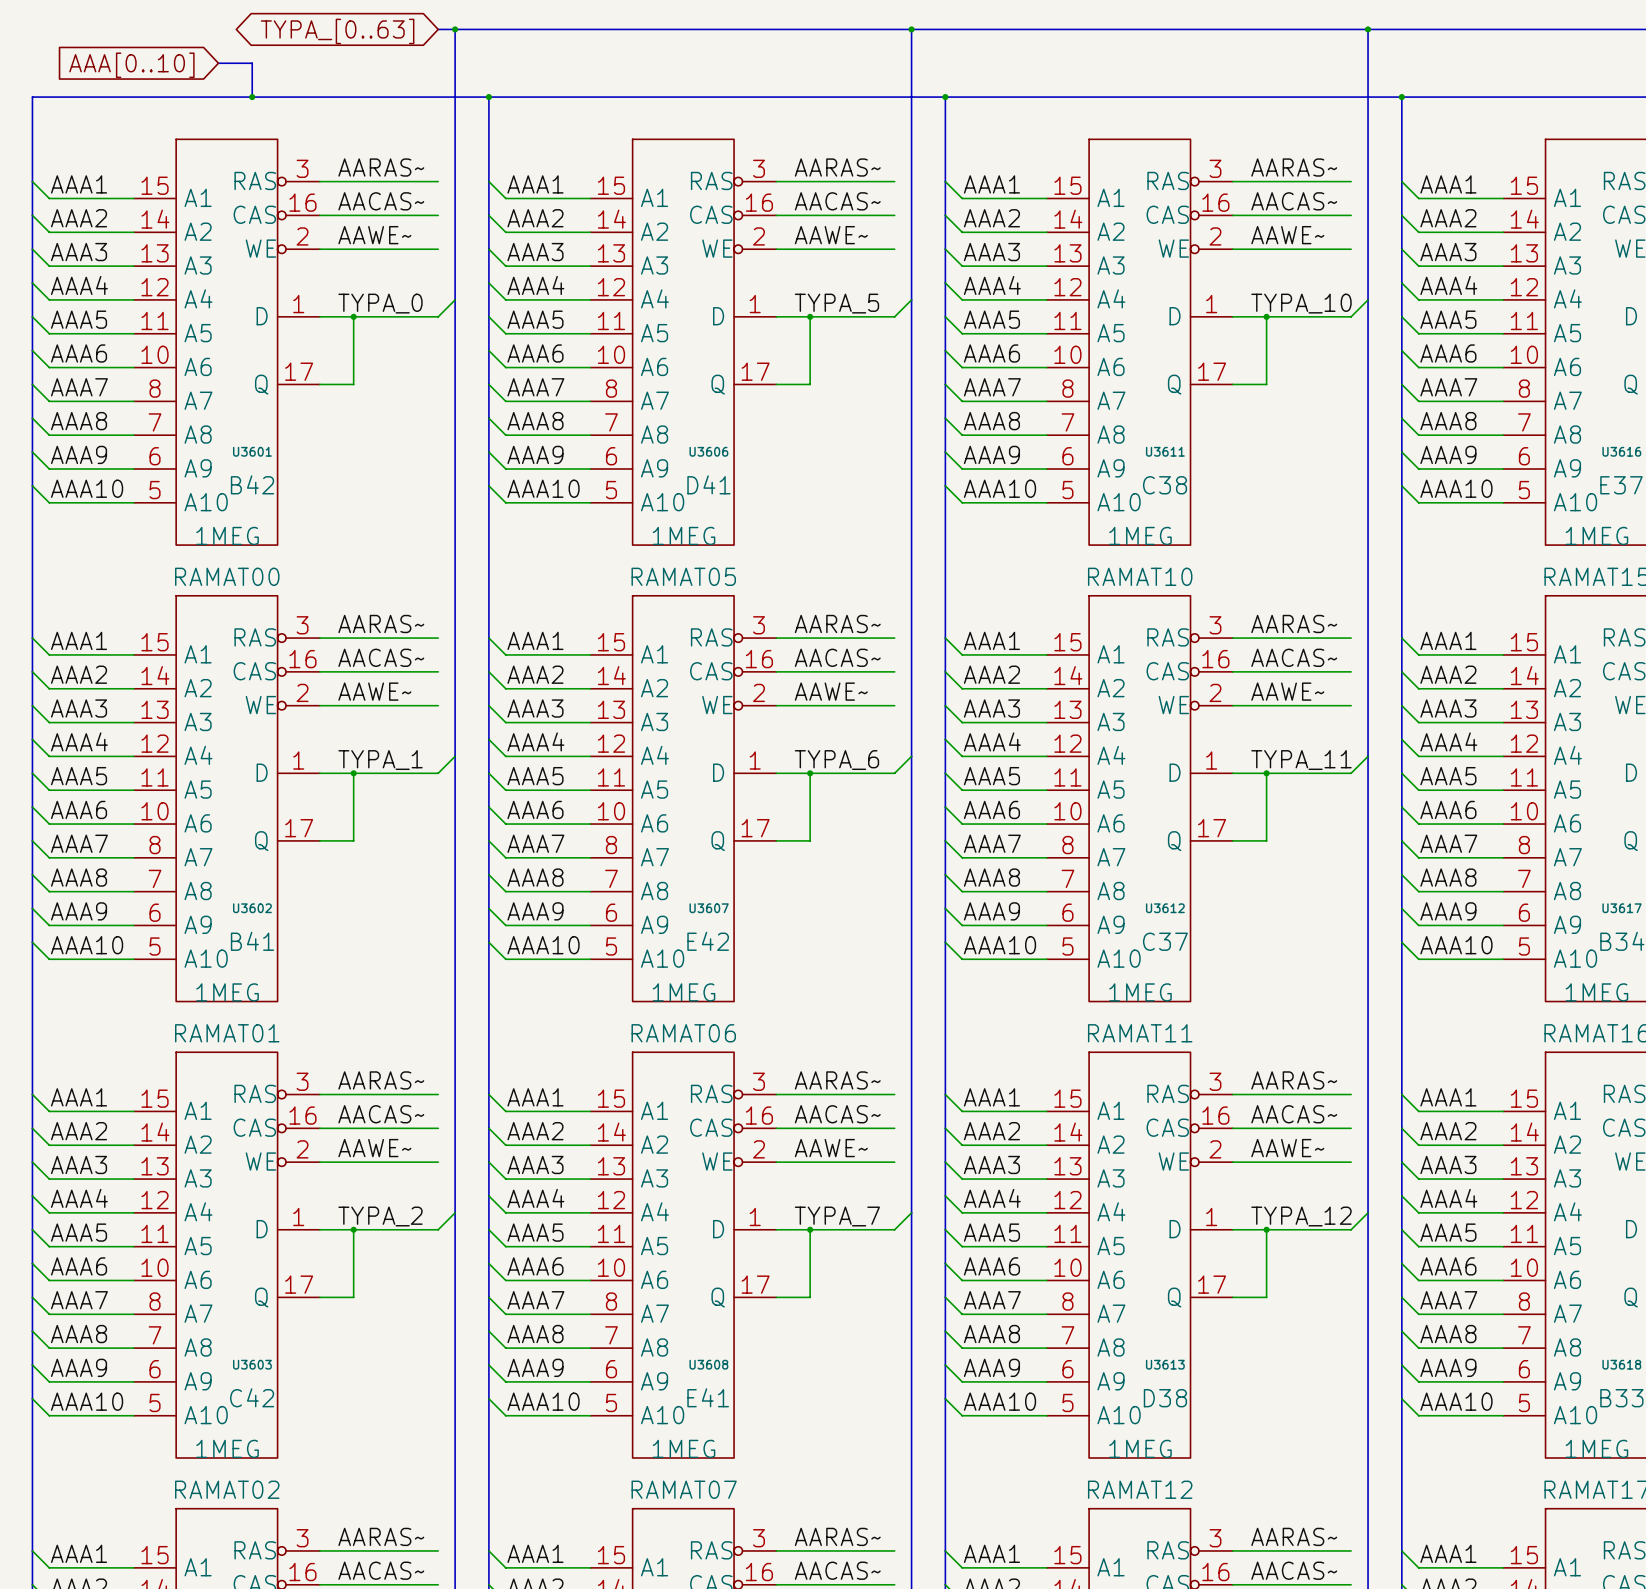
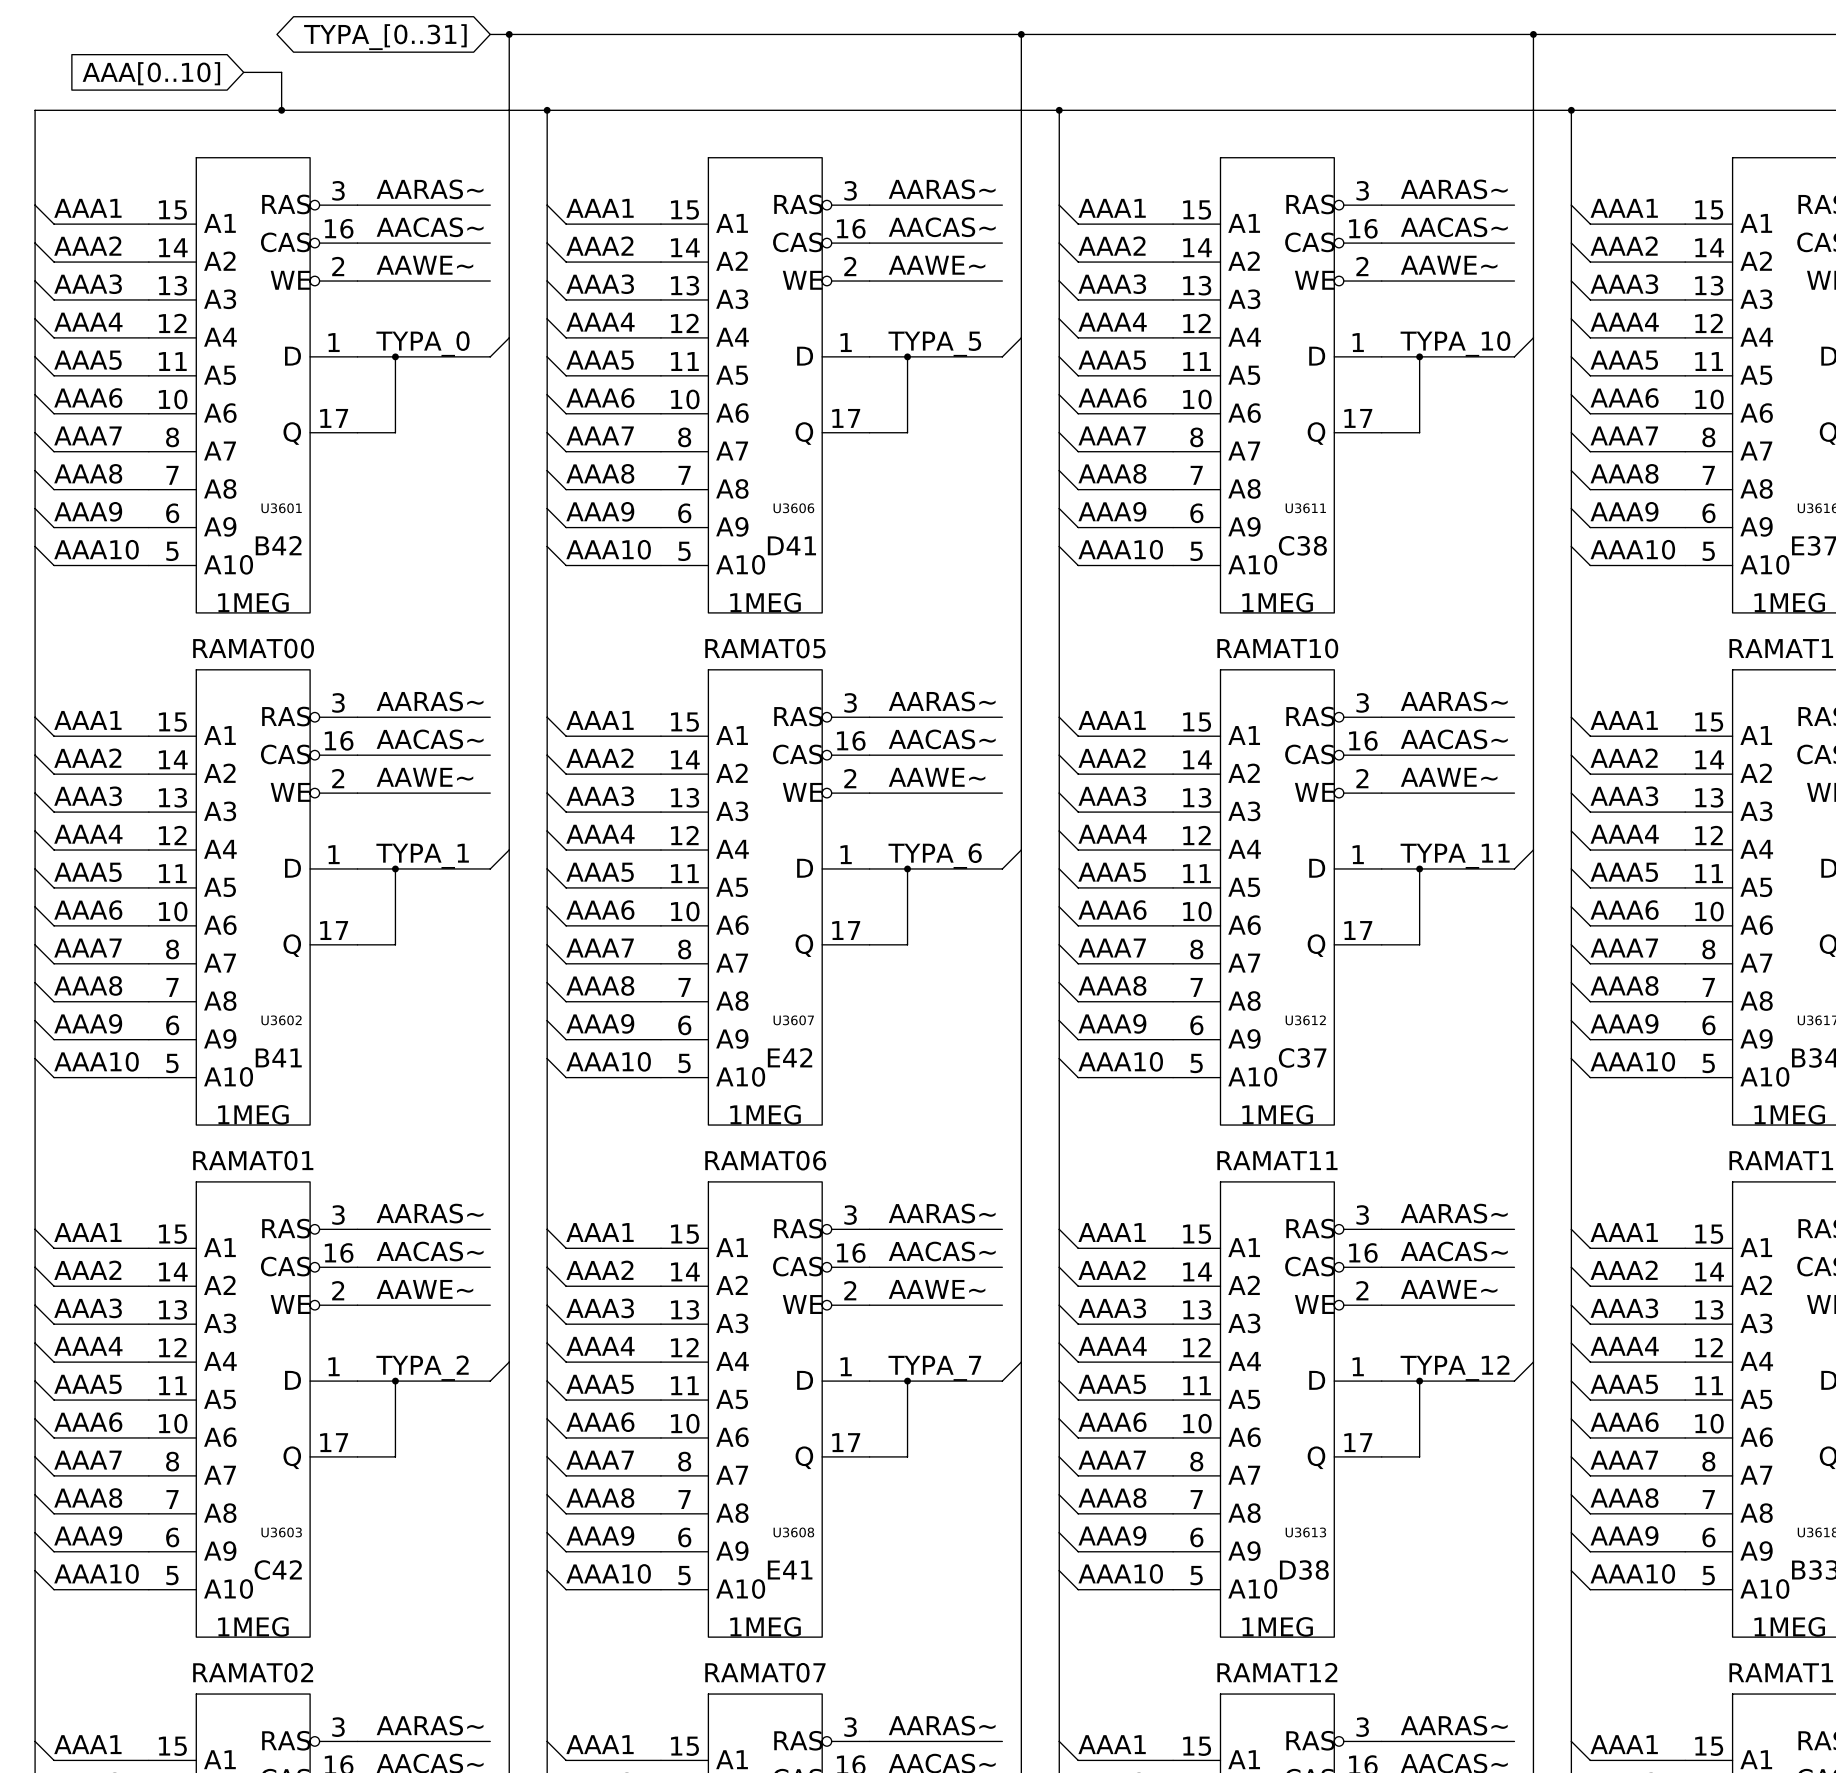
global label: TYPA_[0..63] (337, 31) -> TYPA_[0..31] (385, 37)

